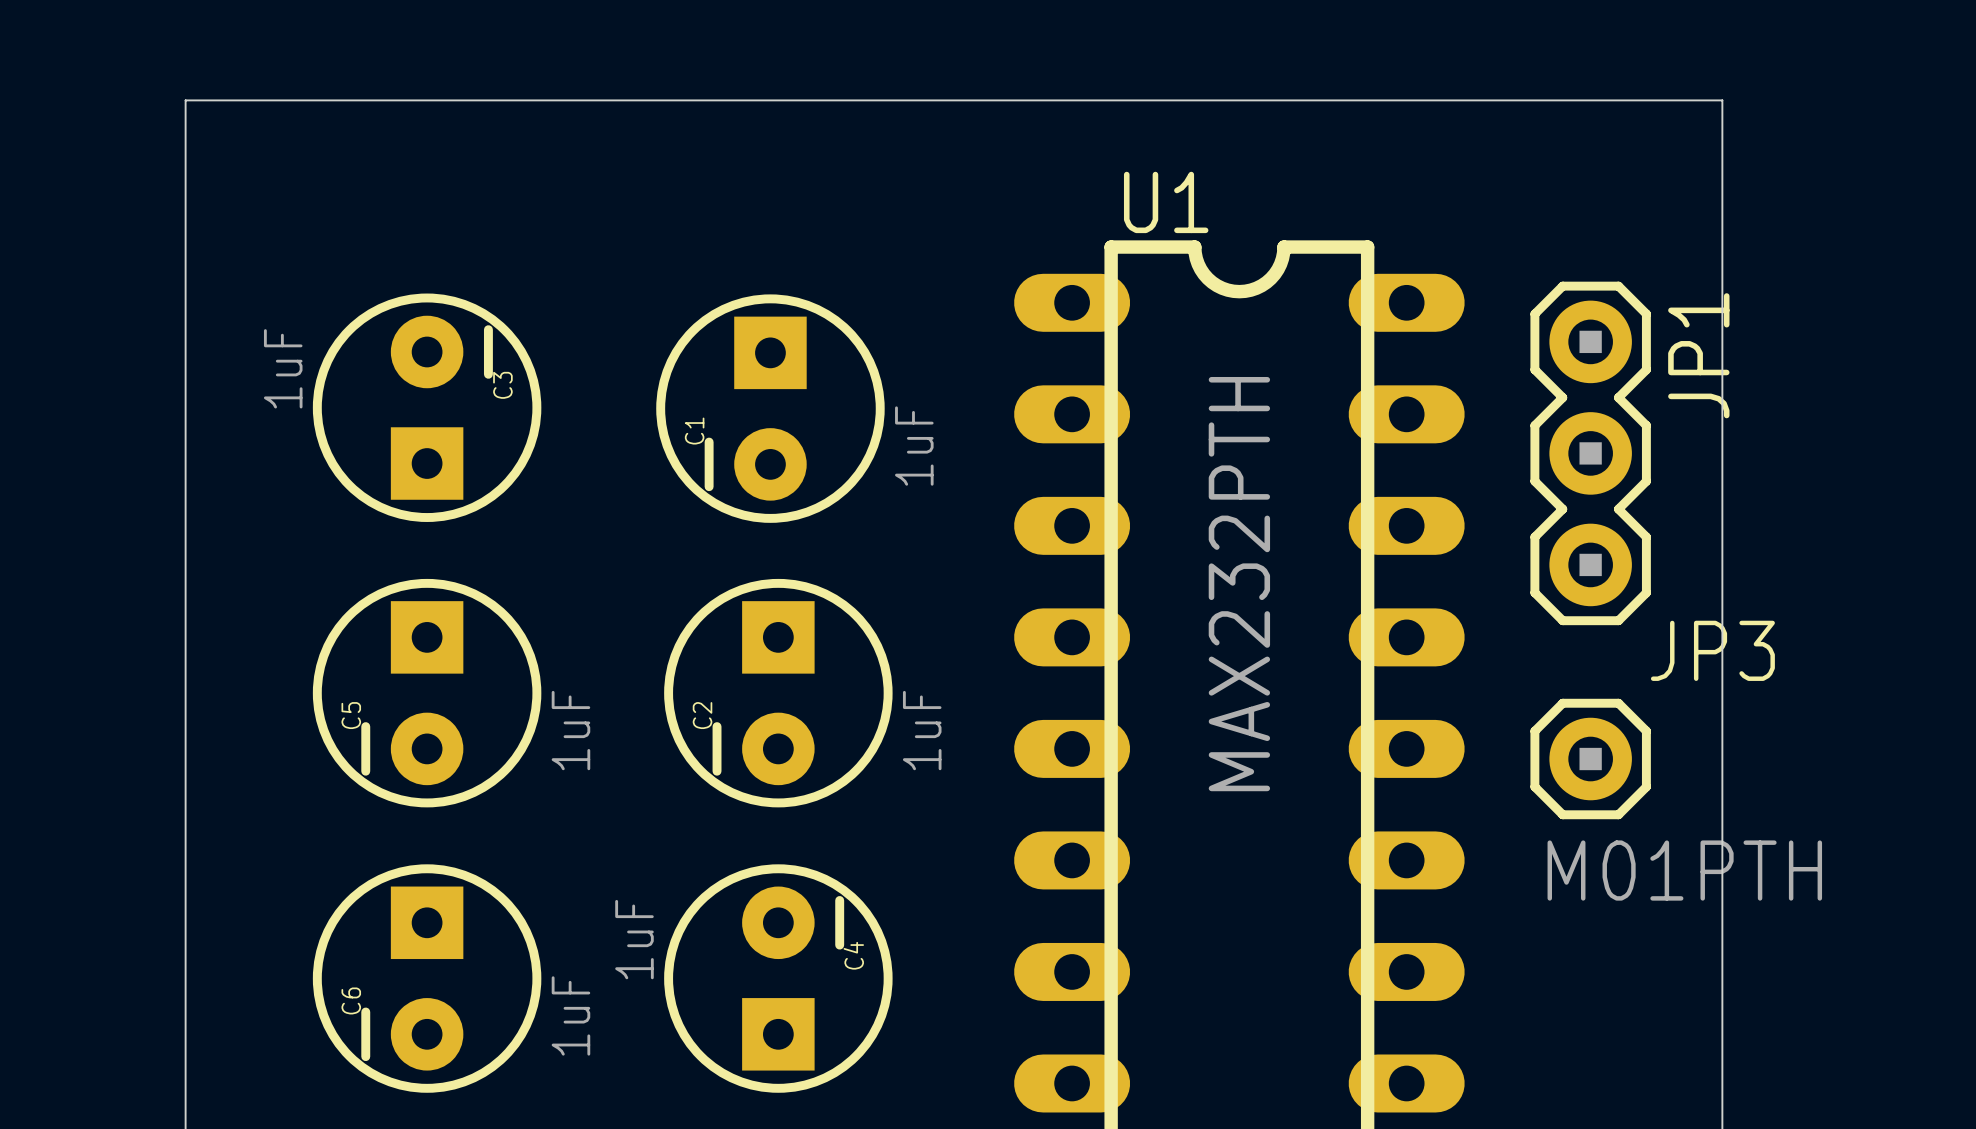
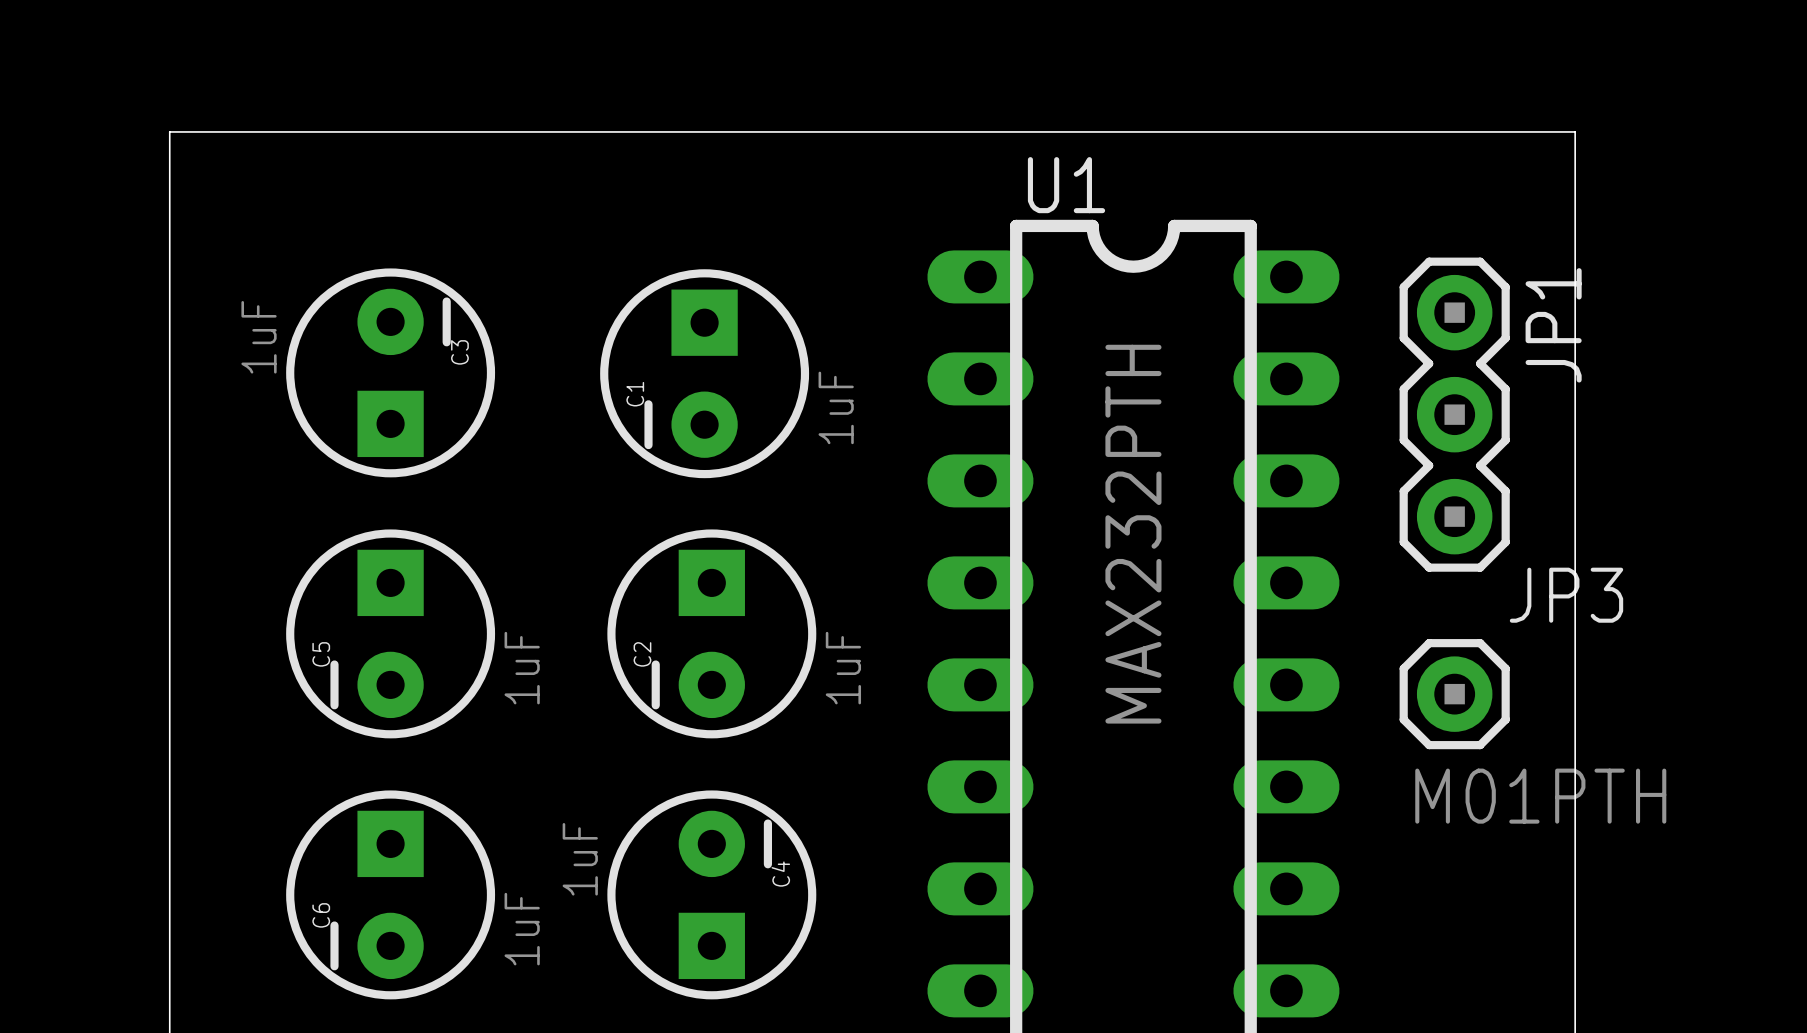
board edge: (185, 144) (185, 100) (1722, 100) (1722, 144) -> (169, 131) (1575, 131)

